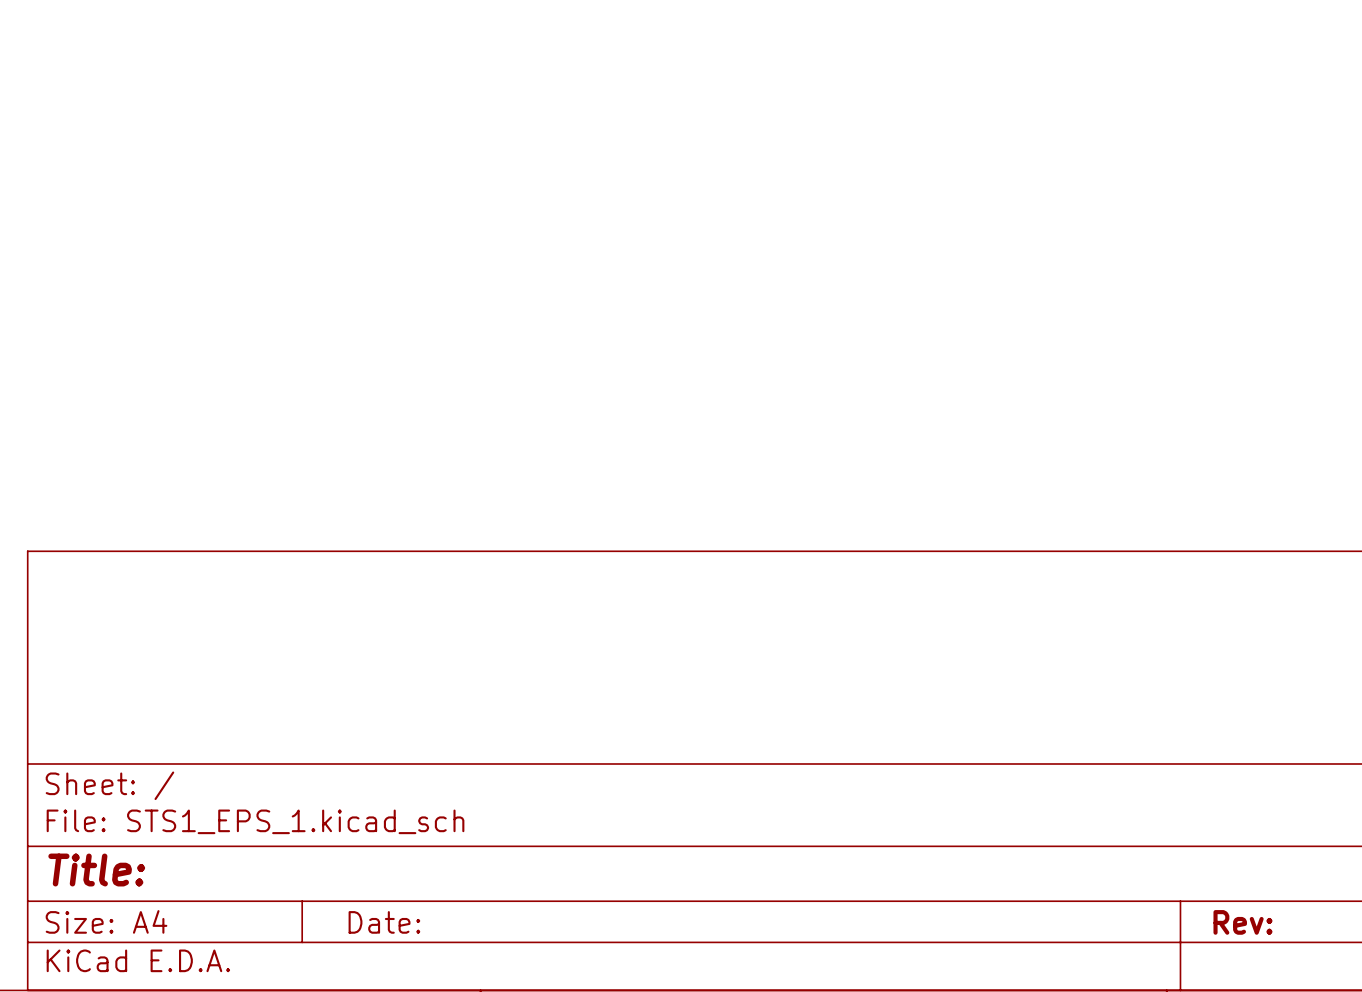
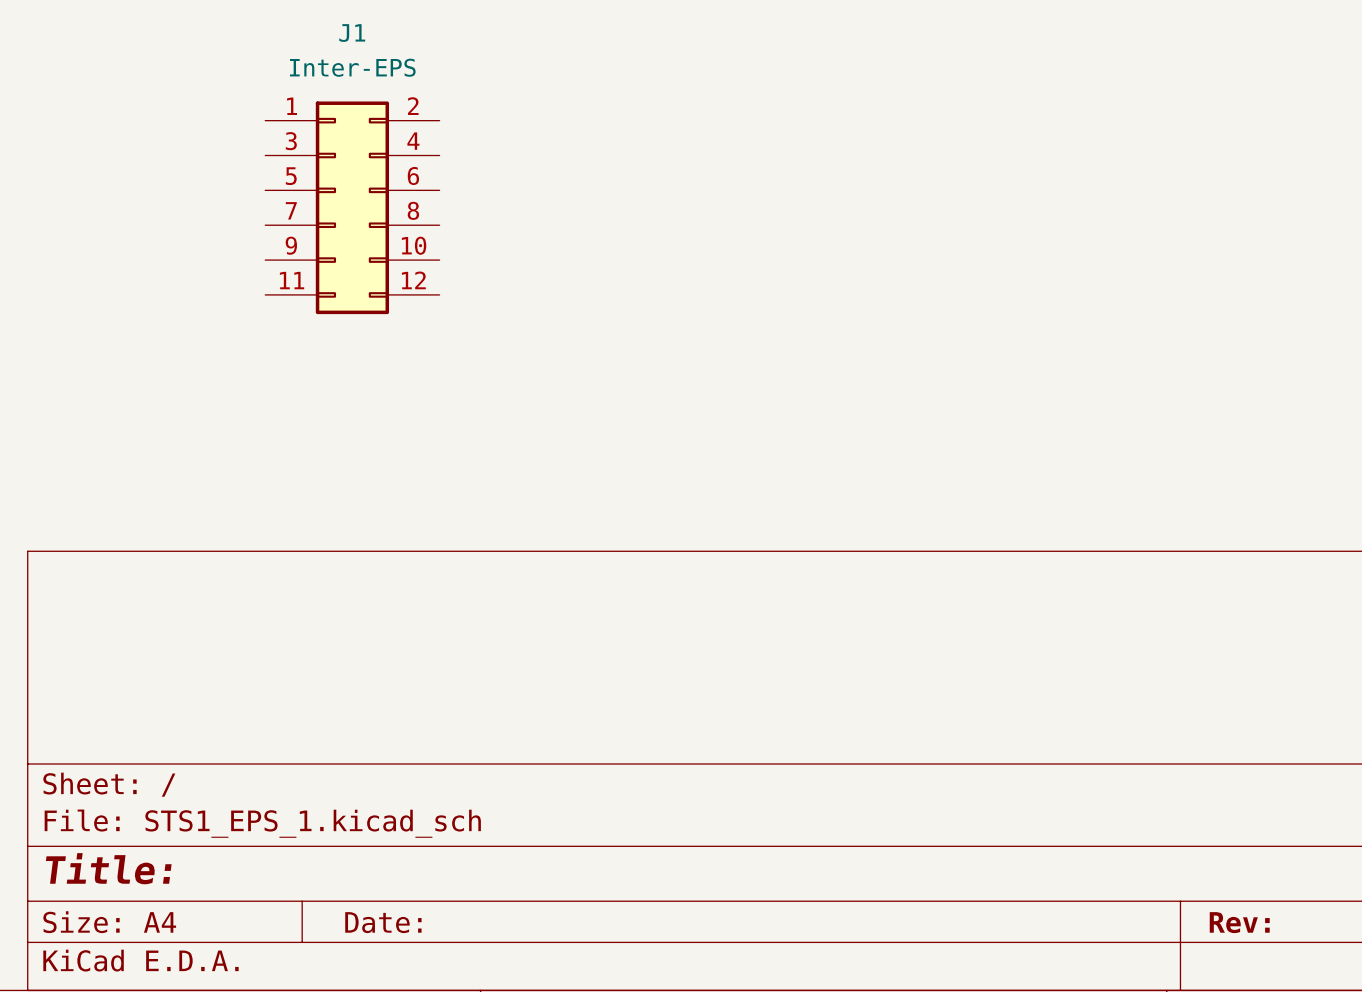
J1: none -> Inter-EPS (352, 207)

